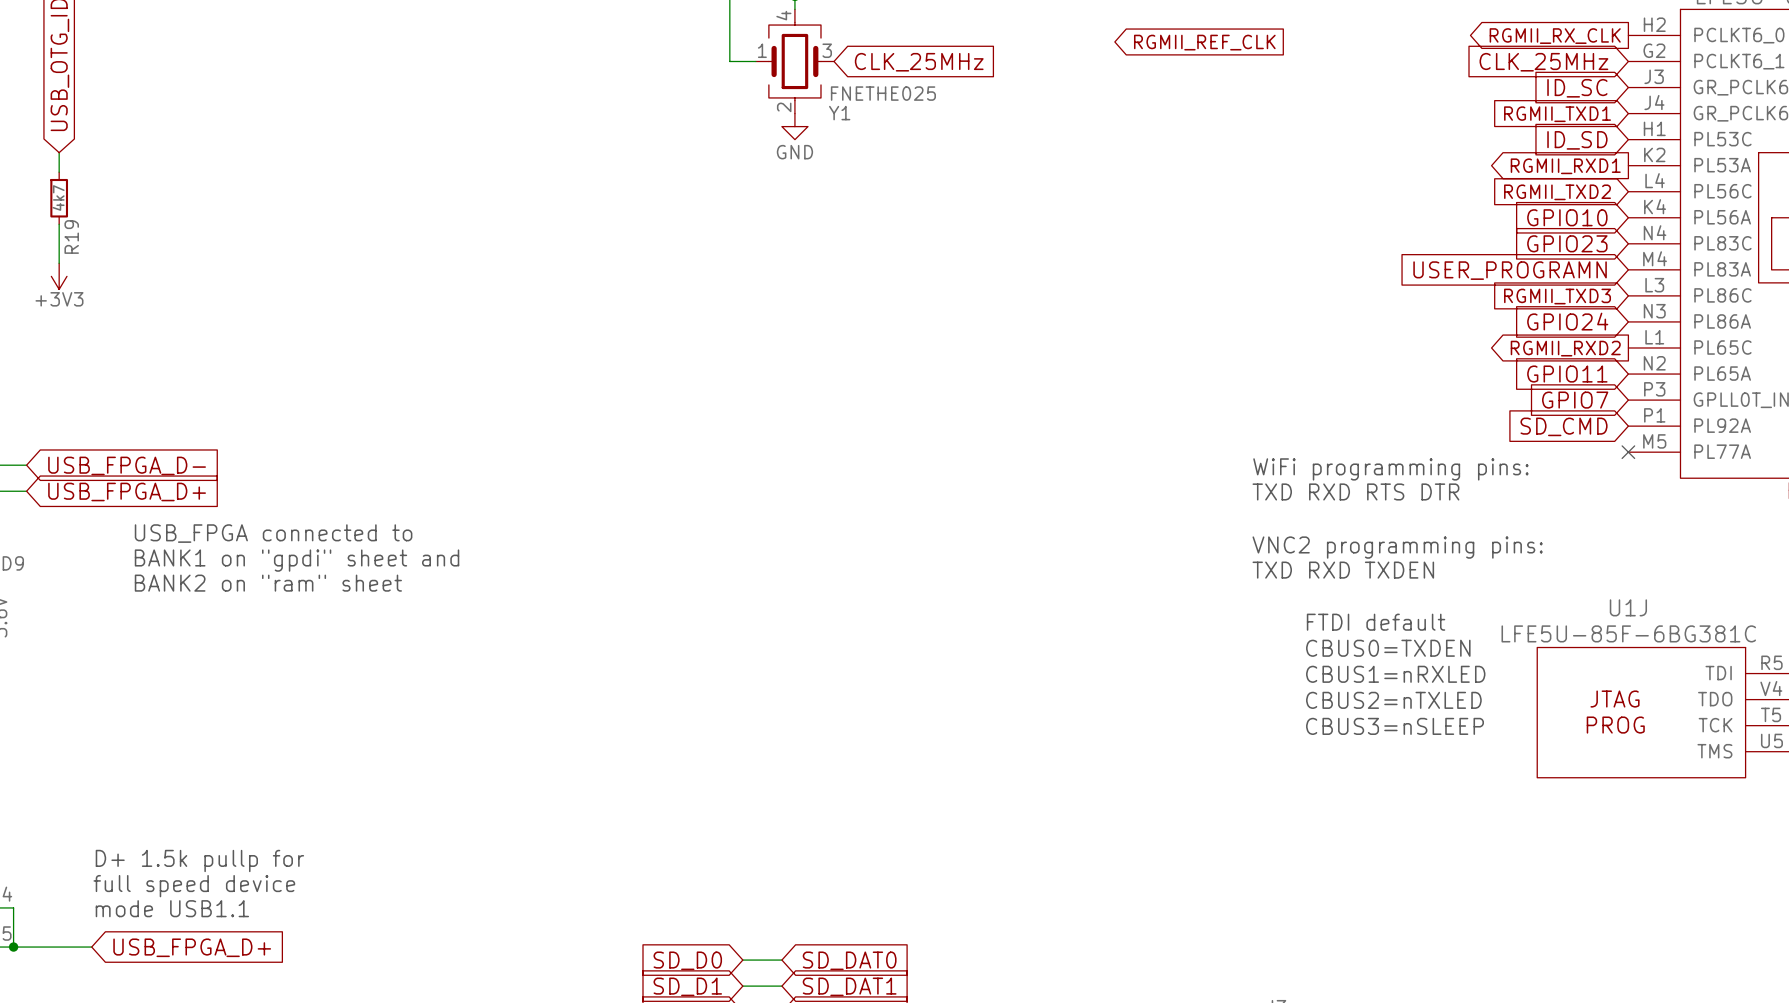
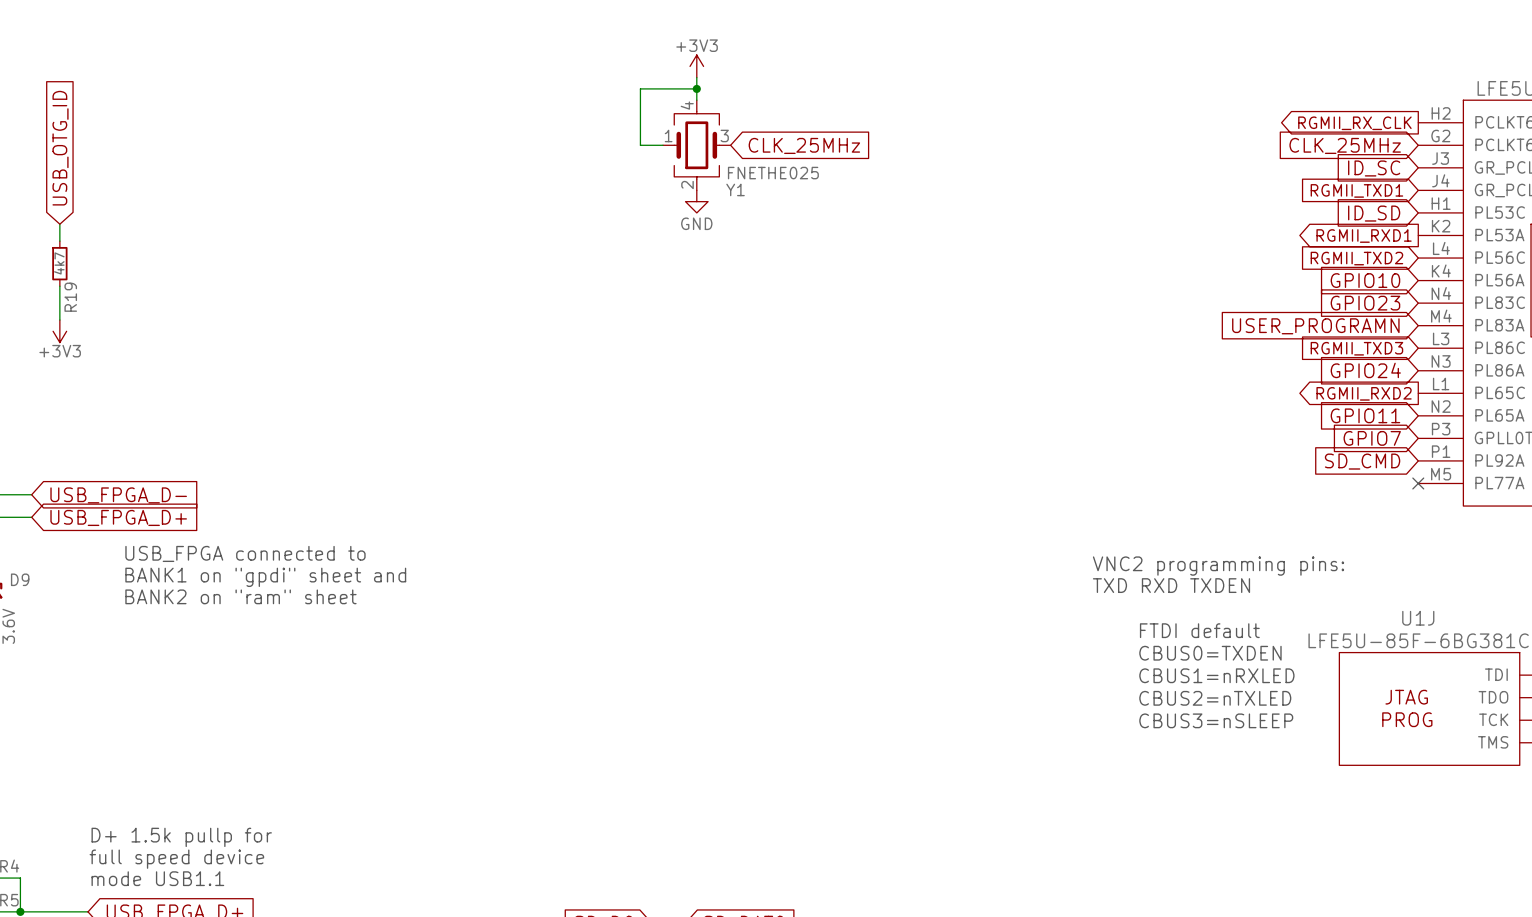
global label: RGMII_REF_CLK (1204, 42) -> none
text: WiFi programming pins: (1390, 469) -> none
text: TXD RXD RTS DTR (1355, 491) -> none

